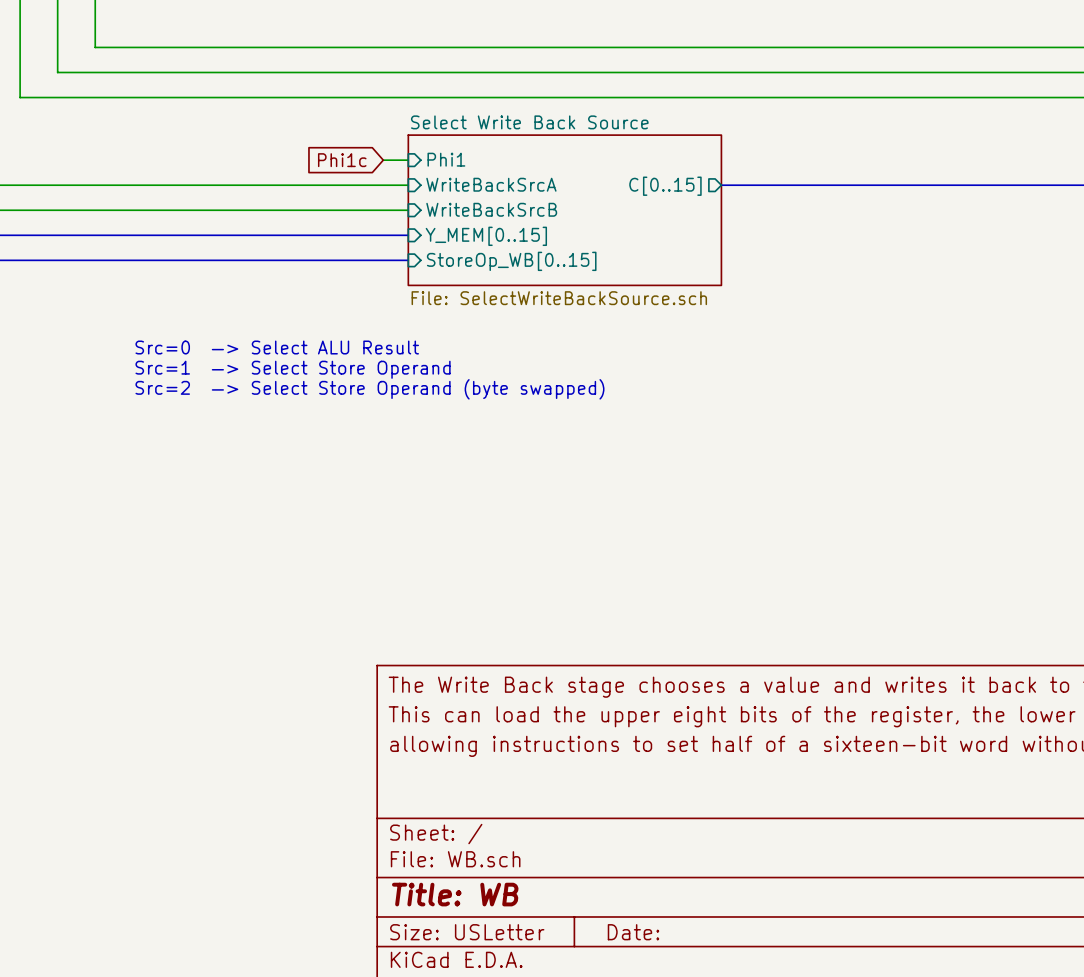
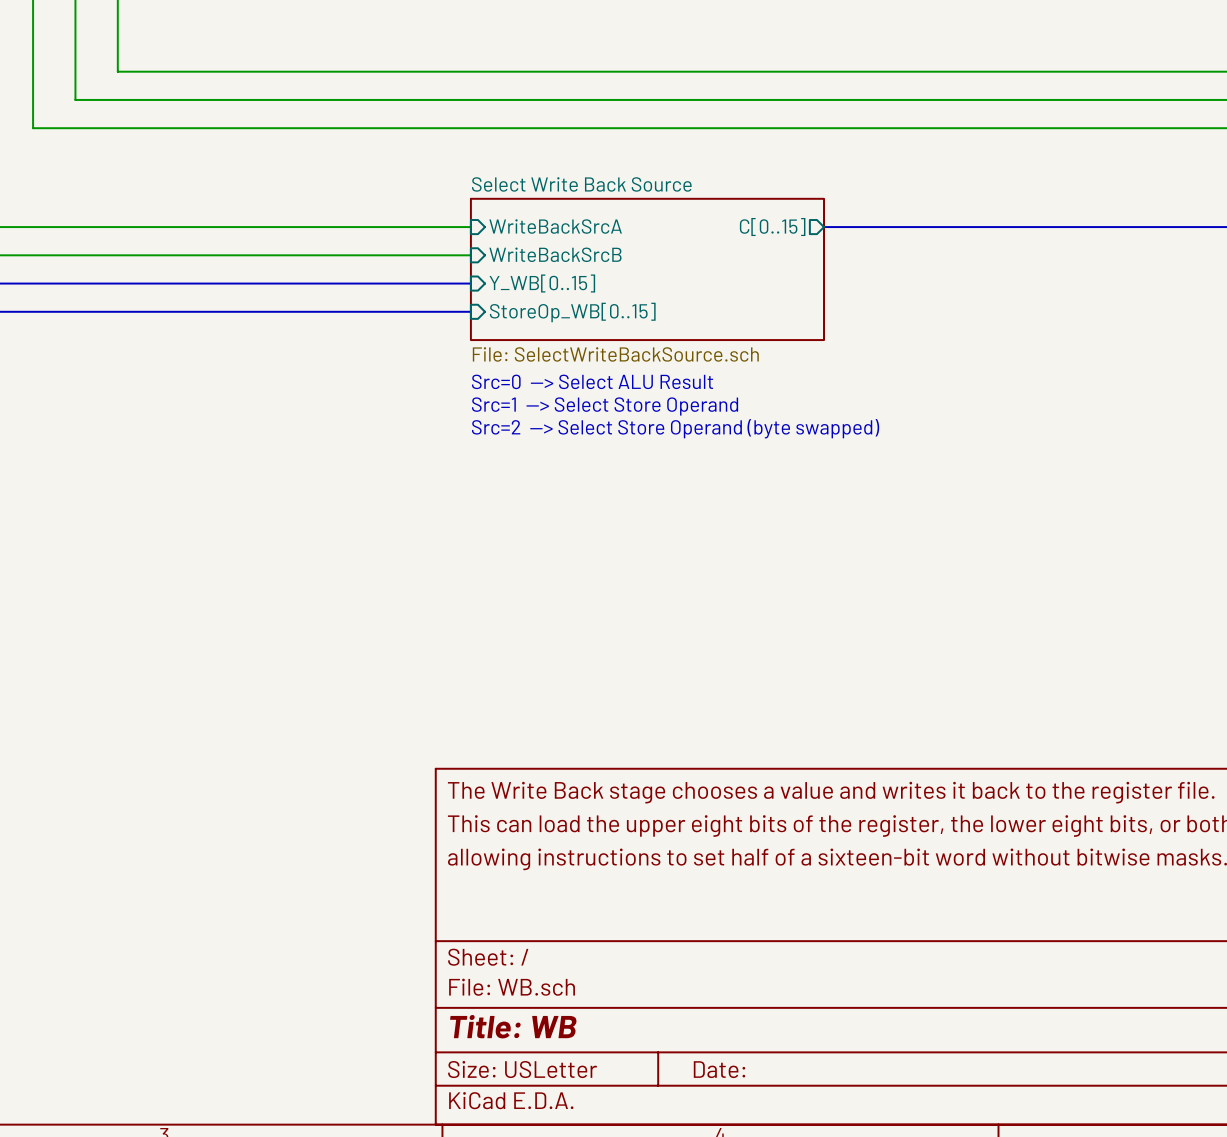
sheet pin: Phi1 (446, 159) -> none
global label: Phi1c (342, 160) -> none
wire: (383, 160) (408, 160) -> none
sheet Select Write Back Source: File: SelectWriteBackSource.sch (564, 210) -> none
sheet Select Write Back Source: none -> File: SelectWriteBackSource.sch (647, 269)
sheet pin: Y_MEM[0..15] (486, 236) -> Y_WB[0..15] (542, 283)
text: none -> Src=0 —> Select ALU Result (592, 381)
text: none -> Src=1 —> Select Store Operand (605, 406)
text: Src=0 —> Select ALU Result (277, 347) -> none
text: none -> Src=2 —> Select Store Operand (byte swapped) (675, 428)
text: Src=1 —> Select Store Operand (293, 369) -> none
text: Src=2 —> Select Store Operand (byte swapped) (369, 389) -> none

